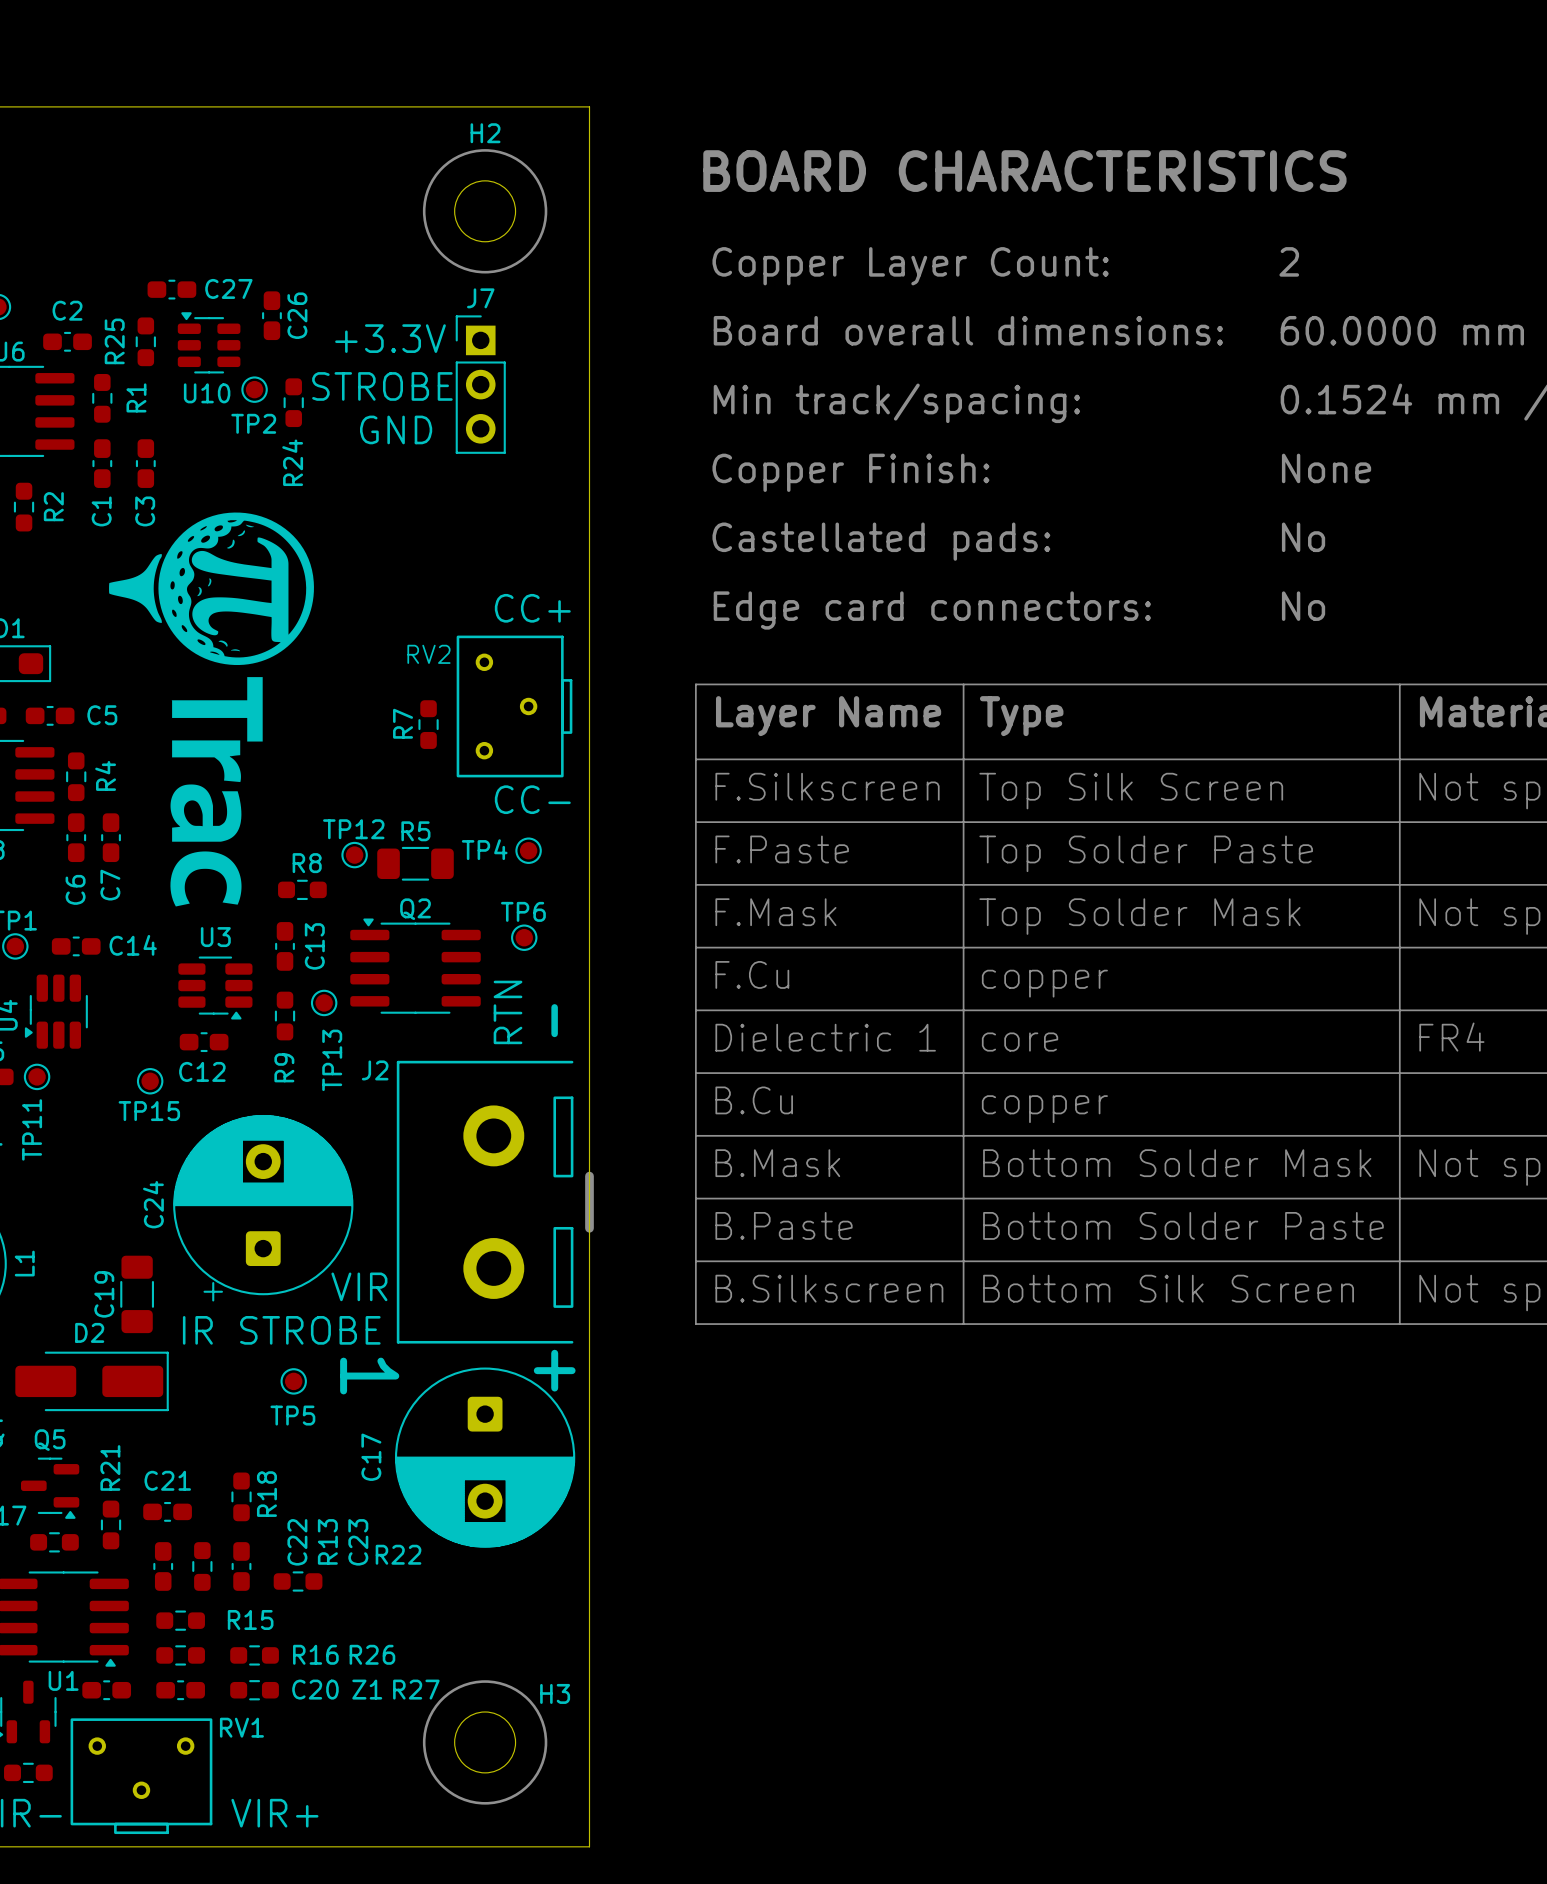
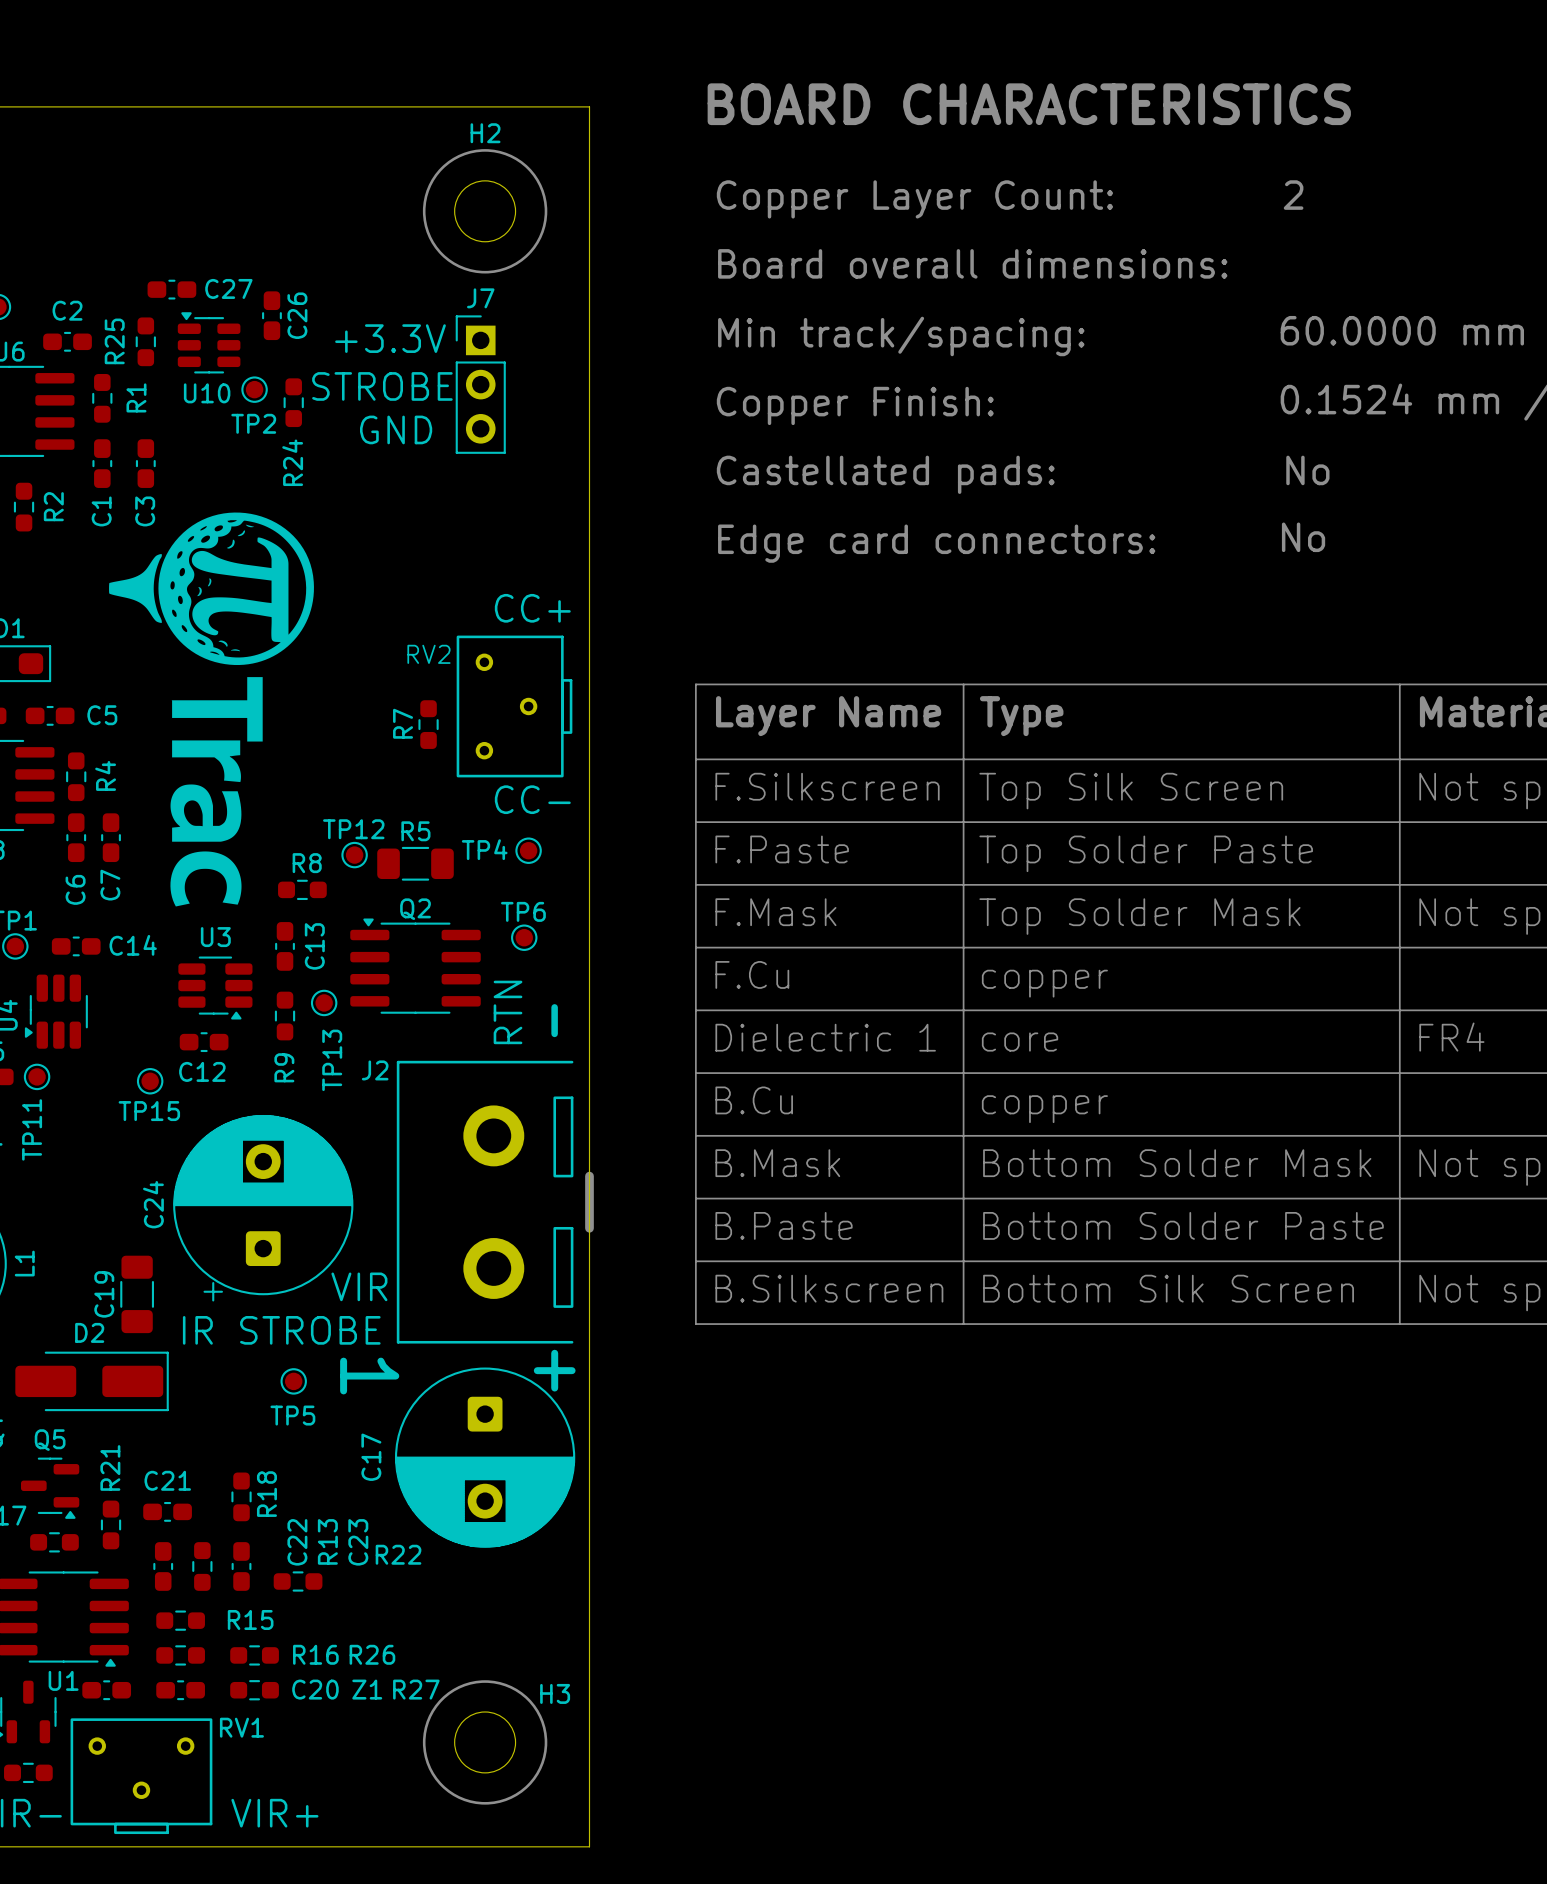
text position: BOARD CHARACTERISTICS (1024, 171) -> BOARD CHARACTERISTICS (1029, 104)
text position: 2 (1289, 261) -> 2 (1293, 195)
text position: Copper Layer Count: (910, 266) -> Copper Layer Count: (914, 199)
text position: Board overall dimensions: (968, 330) -> Board overall dimensions: (972, 263)
text position: Min track/spacing: (896, 403) -> Min track/spacing: (901, 336)
text: None (1326, 468) -> none
text position: Copper Finish: (850, 472) -> Copper Finish: (855, 405)
text position: Castellated pads: (881, 541) -> Castellated pads: (885, 474)
text position: No (1303, 606) -> No (1307, 470)
text position: Edge card connectors: (932, 610) -> Edge card connectors: (936, 543)

